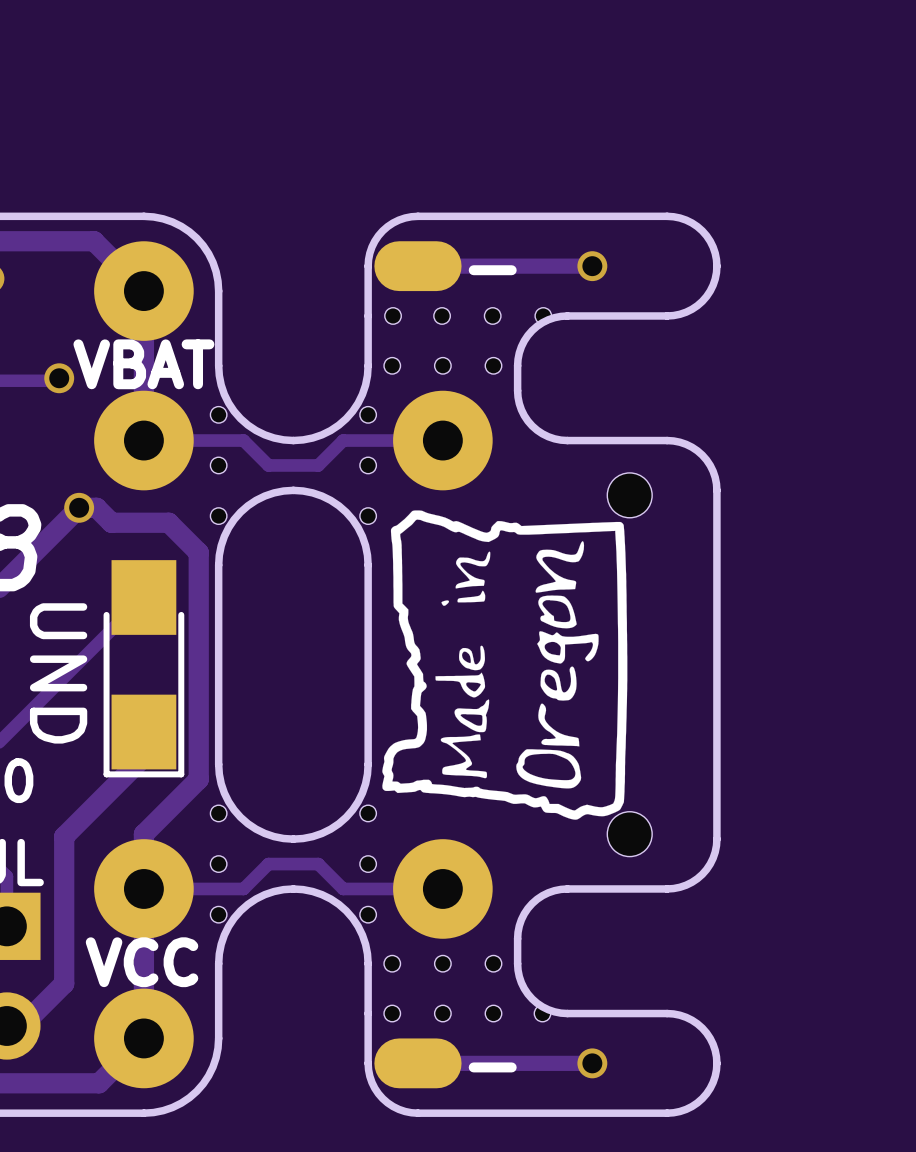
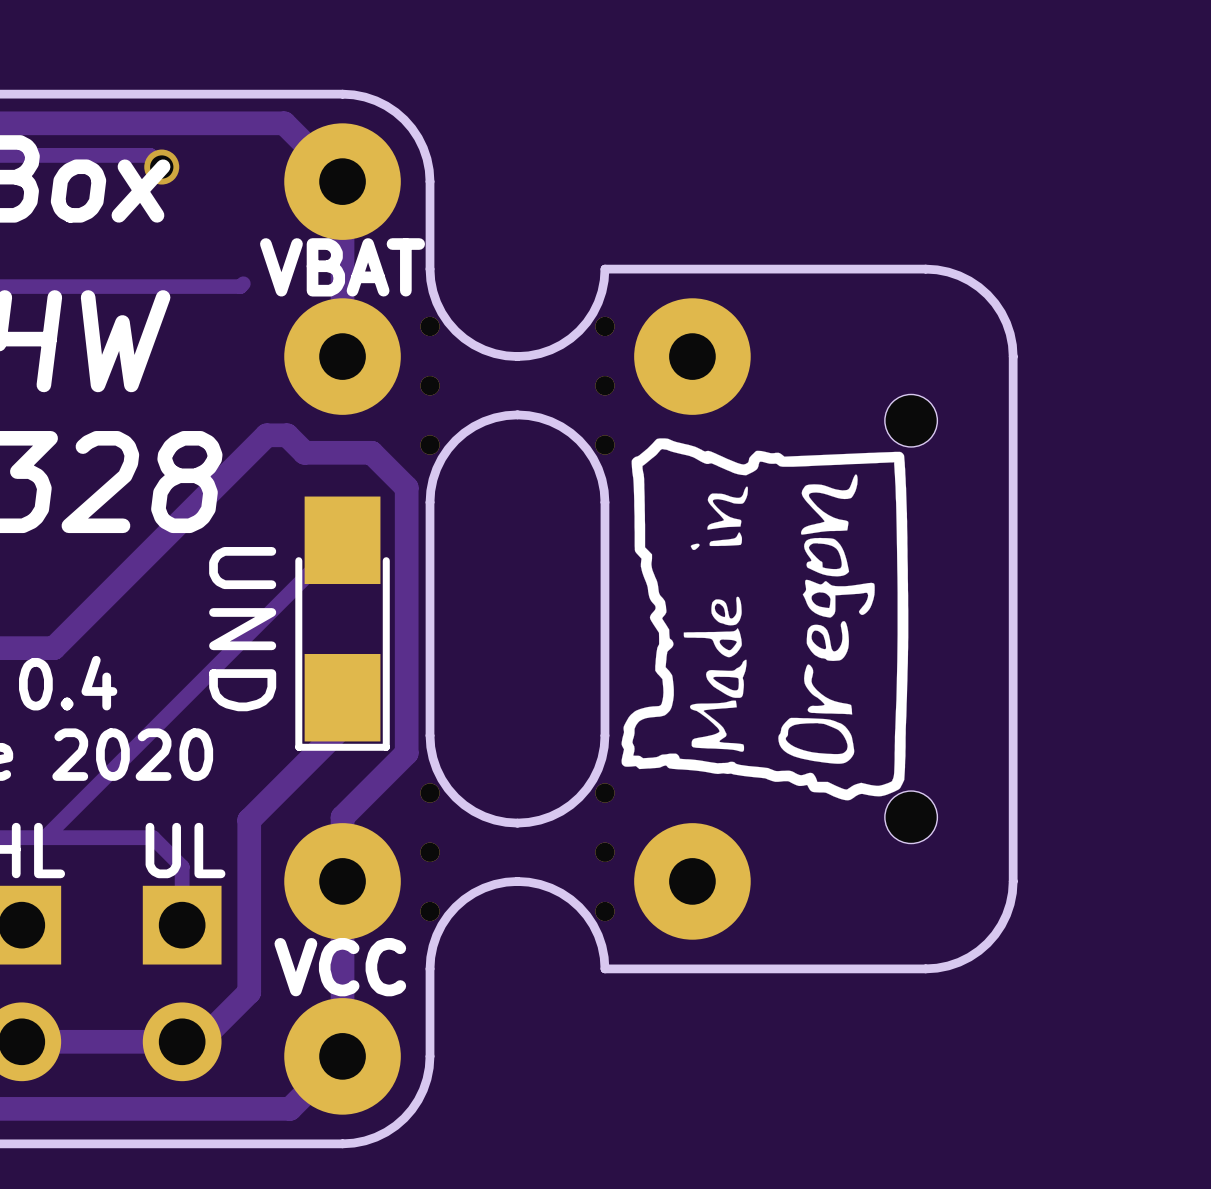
part: (417, 266) -> none
track: (592, 266) (417, 266) -> none
via: (592, 266) -> none
text: - (492, 270) -> none
part: (393, 315) -> none
part: (492, 315) -> none
board edge: (368, 365) (368, 266) (369, 253) (378, 235) (387, 226) (398, 220) (417, 216) (667, 216) (686, 220) (702, 230) (710, 241) (715, 253) (716, 266) (715, 279) (710, 291) (702, 301) (686, 312) (673, 315) (567, 315) (554, 317) (542, 322) (527, 335) (519, 352) (518, 397) (521, 409) (527, 421) (537, 430) (554, 438) (567, 440) (667, 440) (686, 444) (697, 450) (706, 460) (713, 471) (716, 490) -> (604, 269) (925, 269) (959, 275) (987, 294) (1006, 323) (1012, 345) (1013, 414)
part: (442, 365) -> none
via: (59, 378) -> none
part footprint: [210, 406, 227, 525] -> [420, 316, 440, 455]
part footprint: [359, 406, 377, 525] -> [595, 316, 615, 455]
track: (442, 440) (343, 440) (318, 465) (268, 465) (243, 440) (143, 440) -> none
via: (79, 507) -> none
part footprint: [210, 805, 227, 923] -> [420, 783, 440, 922]
part footprint: [359, 805, 377, 923] -> [595, 783, 615, 922]
board edge: (716, 839) (713, 858) (706, 869) (697, 878) (686, 885) (667, 888) (567, 888) (554, 890) (537, 899) (527, 908) (521, 919) (518, 932) (519, 976) (527, 994) (542, 1006) (554, 1011) (567, 1013) (673, 1013) (686, 1017) (702, 1028) (710, 1038) (715, 1050) (716, 1063) (715, 1076) (710, 1088) (702, 1098) (686, 1109) (667, 1113) (417, 1113) (398, 1109) (387, 1102) (378, 1093) (369, 1076) (368, 1063) (368, 963) -> (1013, 823) (1012, 892) (1006, 914) (987, 943) (959, 962) (925, 968) (604, 968)
track: (442, 888) (343, 888) (318, 864) (268, 864) (243, 888) (143, 888) -> none
part: (442, 963) -> none
part: (442, 1013) -> none
part: (542, 1013) -> none
part: (417, 1063) -> none
track: (592, 1063) (417, 1063) -> none
via: (592, 1063) -> none
text: - (492, 1067) -> none

